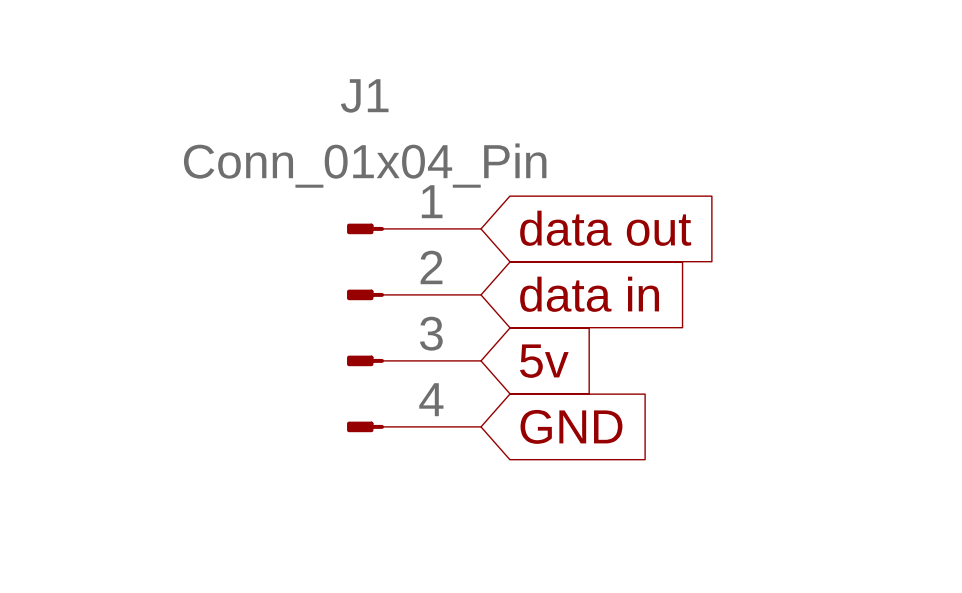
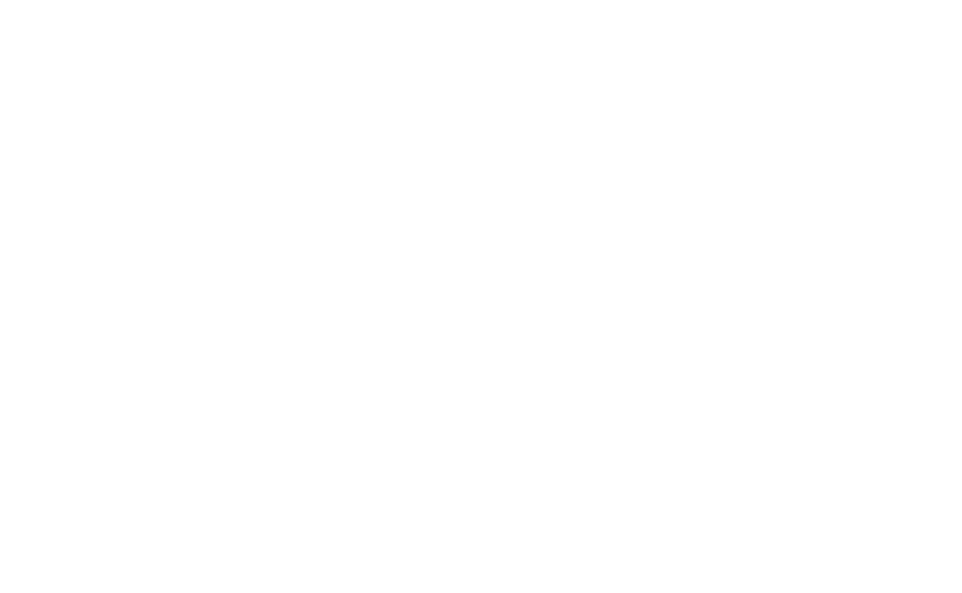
global label: data out (605, 228) -> none
global label: data in (589, 294) -> none
J1: Conn_01x04_Pin (414, 327) -> none
global label: 5v (544, 361) -> none
global label: GND (571, 426) -> none

